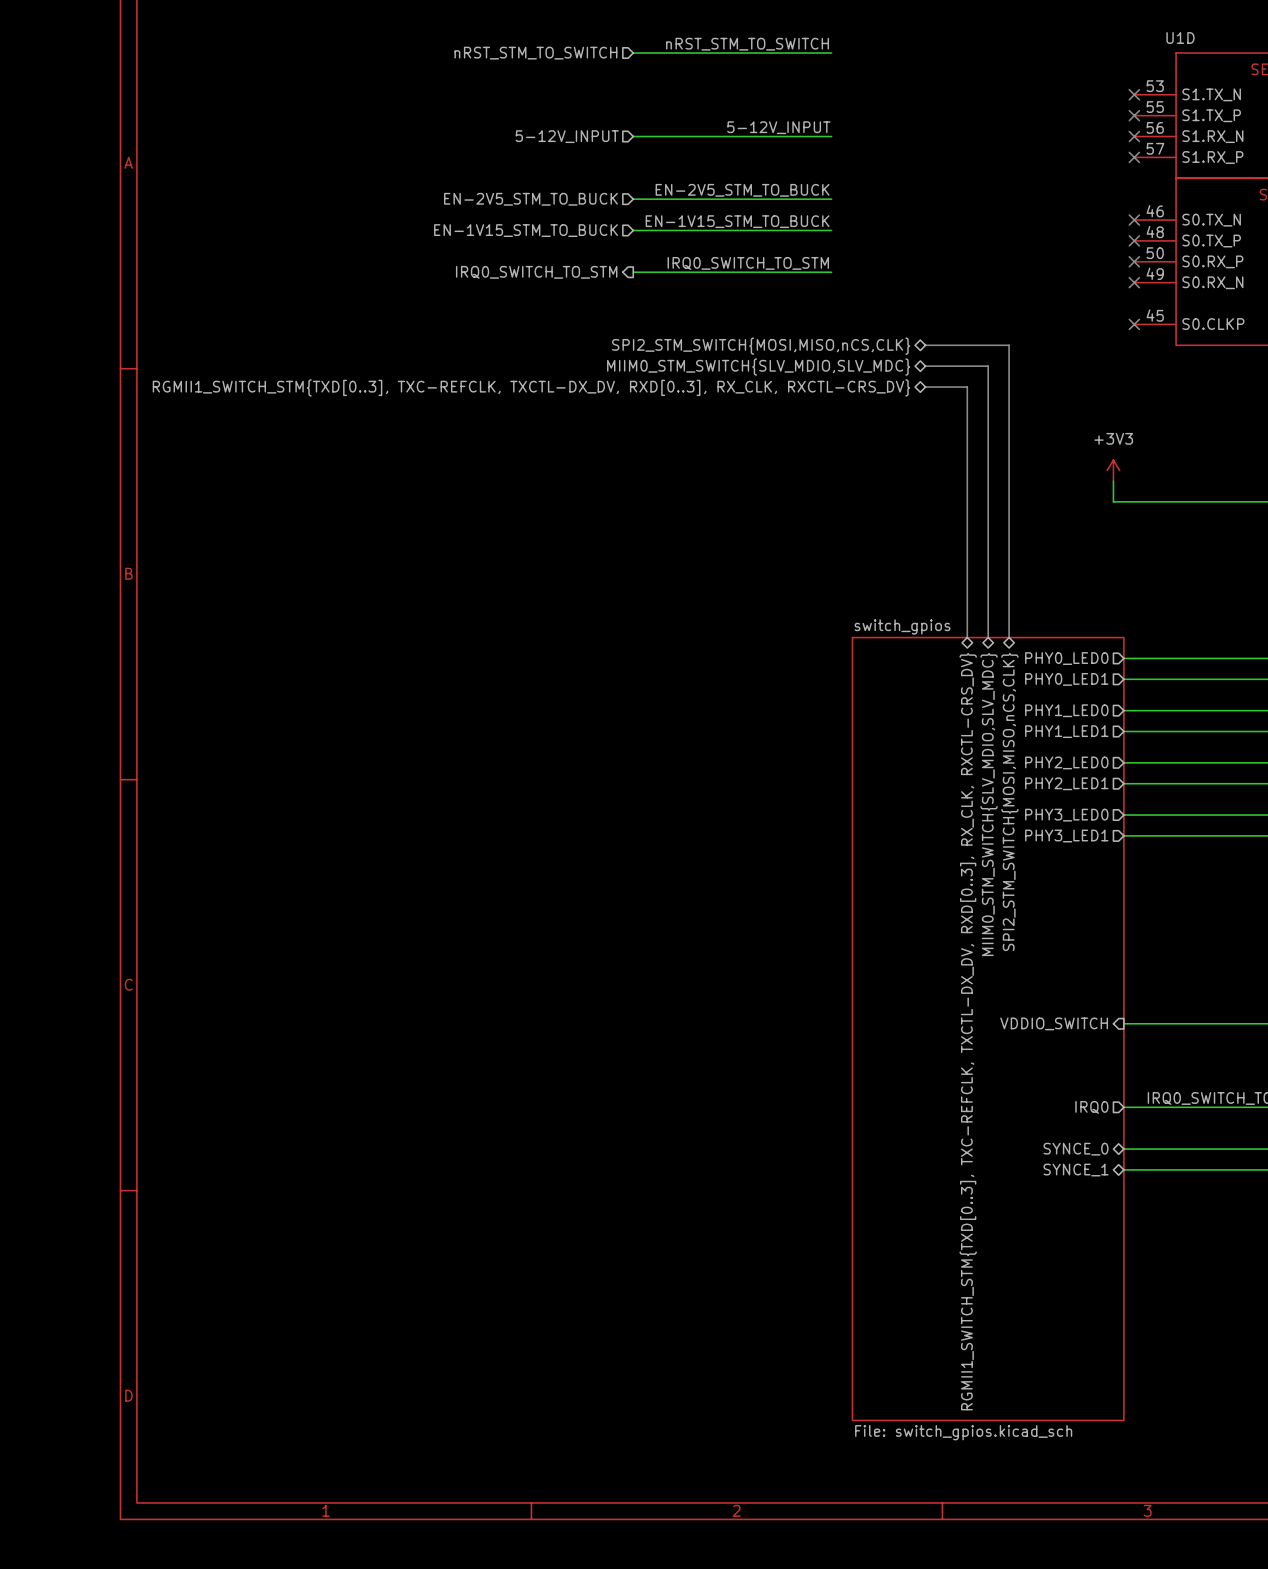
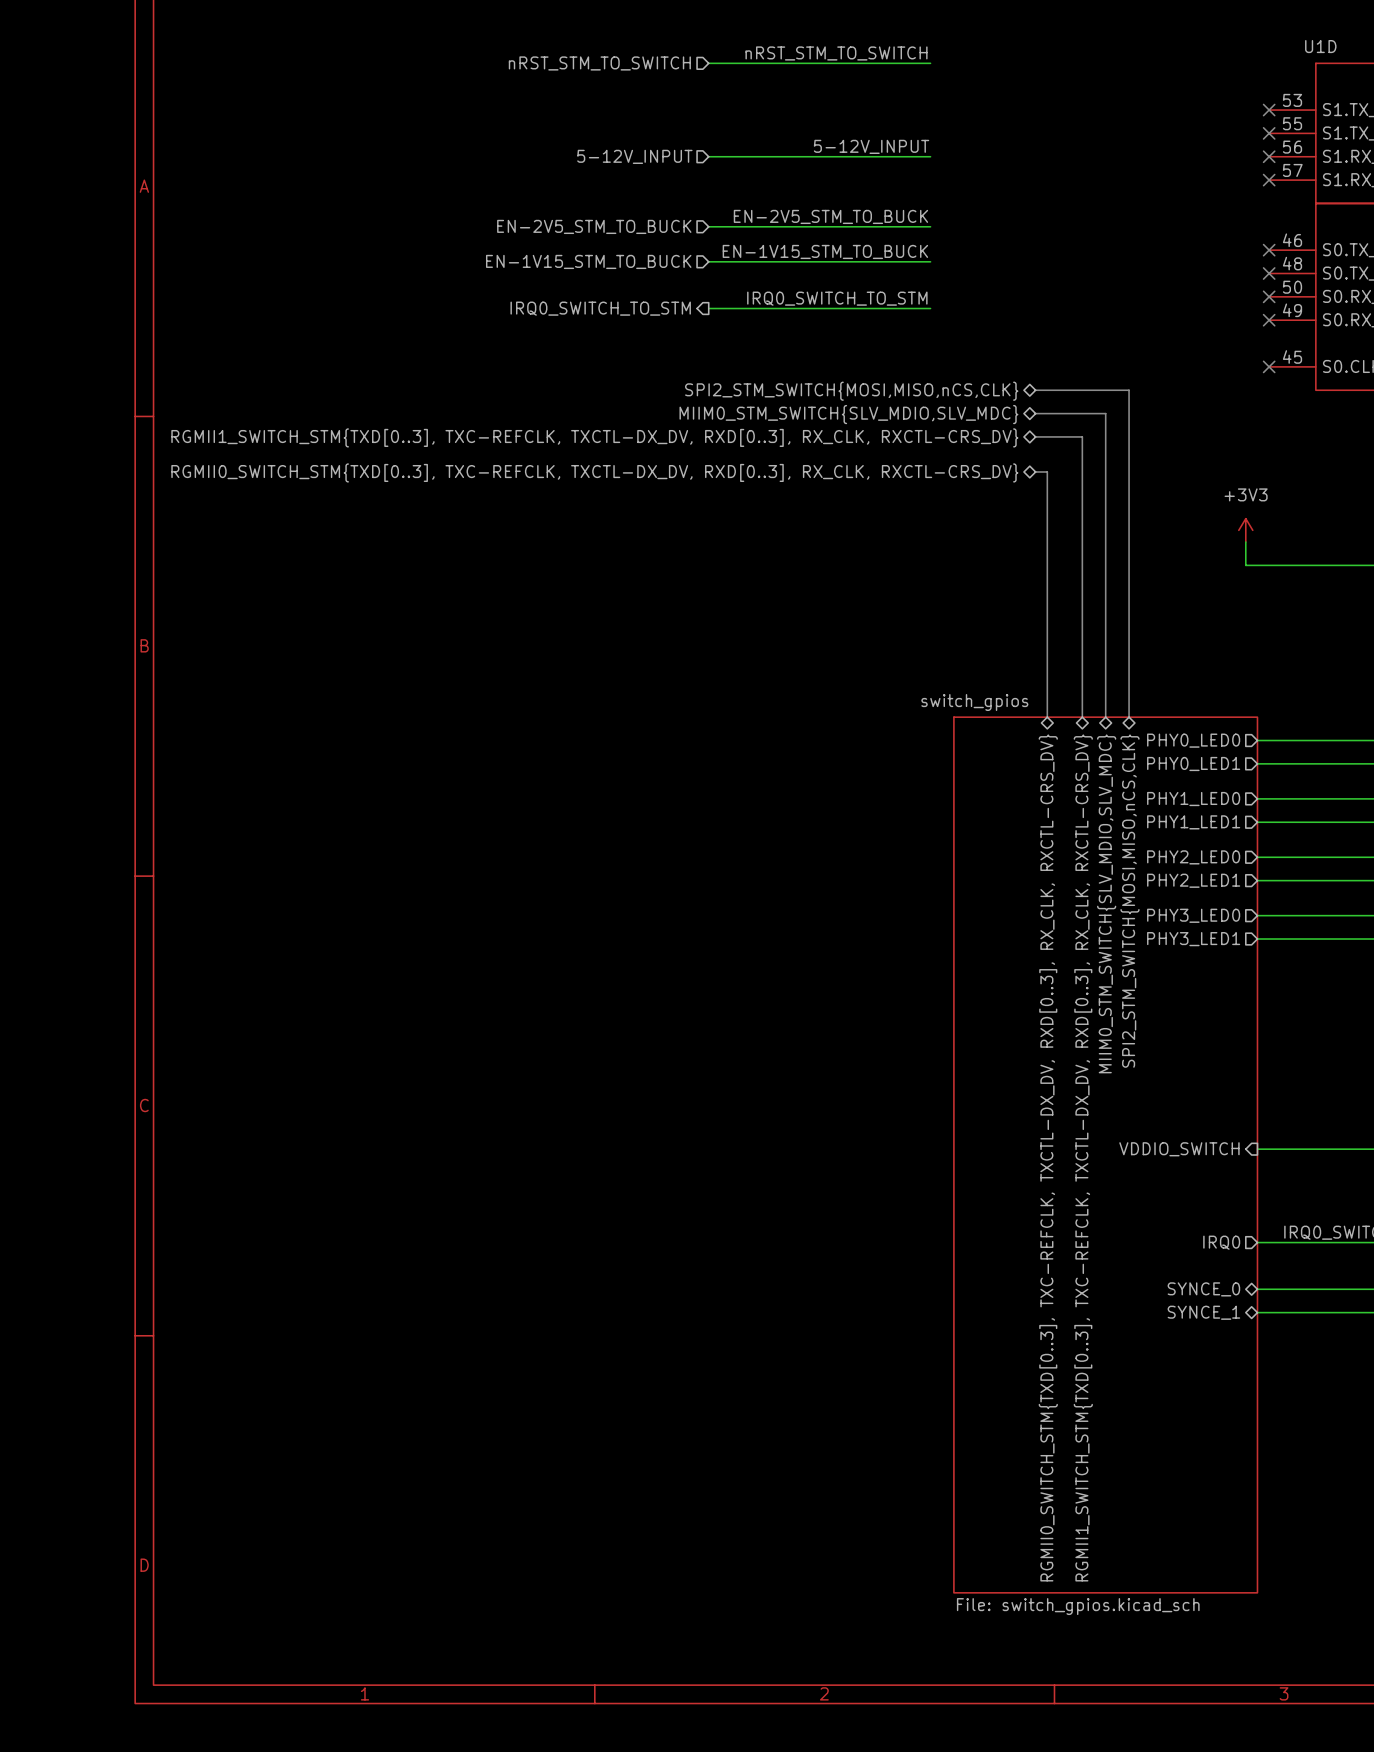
bus: none -> (1035, 471) (1047, 471) (1047, 717)
hierarchical label: none -> RGMII0_SWITCH_STM{TXD[0..3], TXC-REFCLK, TXCTL-DX_DV, RXD[0..3], RX_CLK, RXCTL-CRS_DV} (594, 472)
sheet switch_gpios name position: switch_gpios (902, 626) -> switch_gpios (974, 702)
sheet pin: none -> RGMII0_SWITCH_STM{TXD[0..3], TXC-REFCLK, TXCTL-DX_DV, RXD[0..3], RX_CLK, RXCTL-CRS_DV} (1048, 1157)

